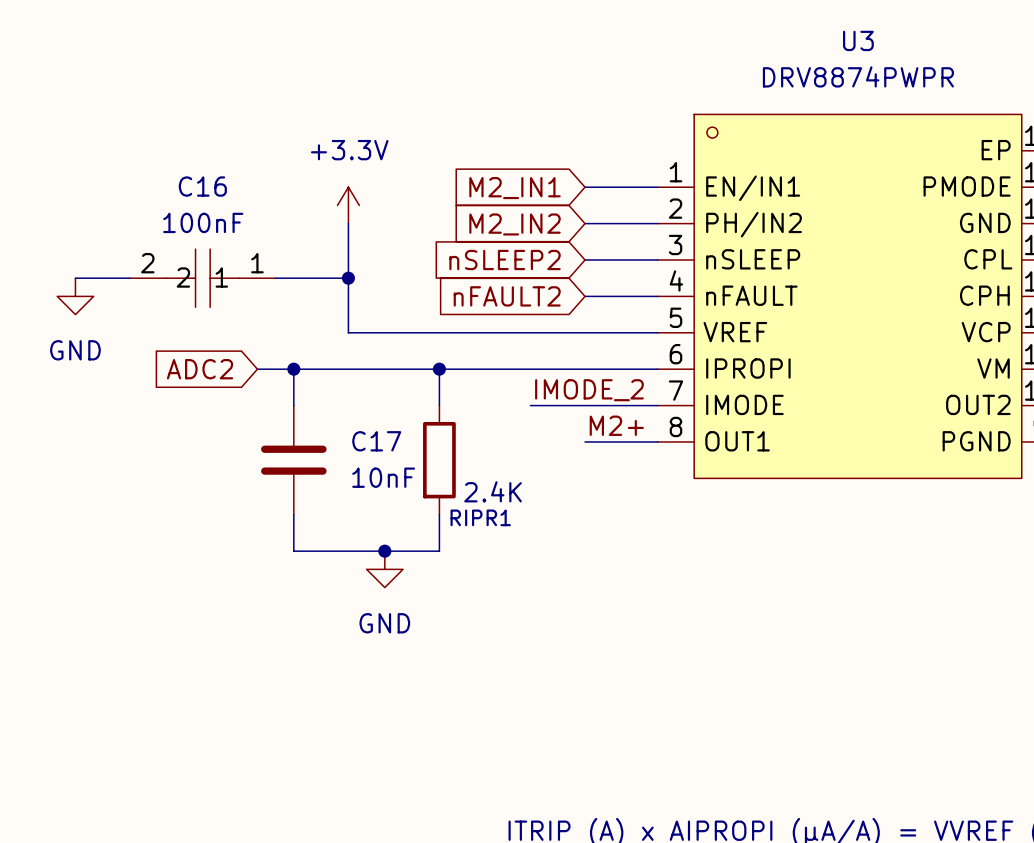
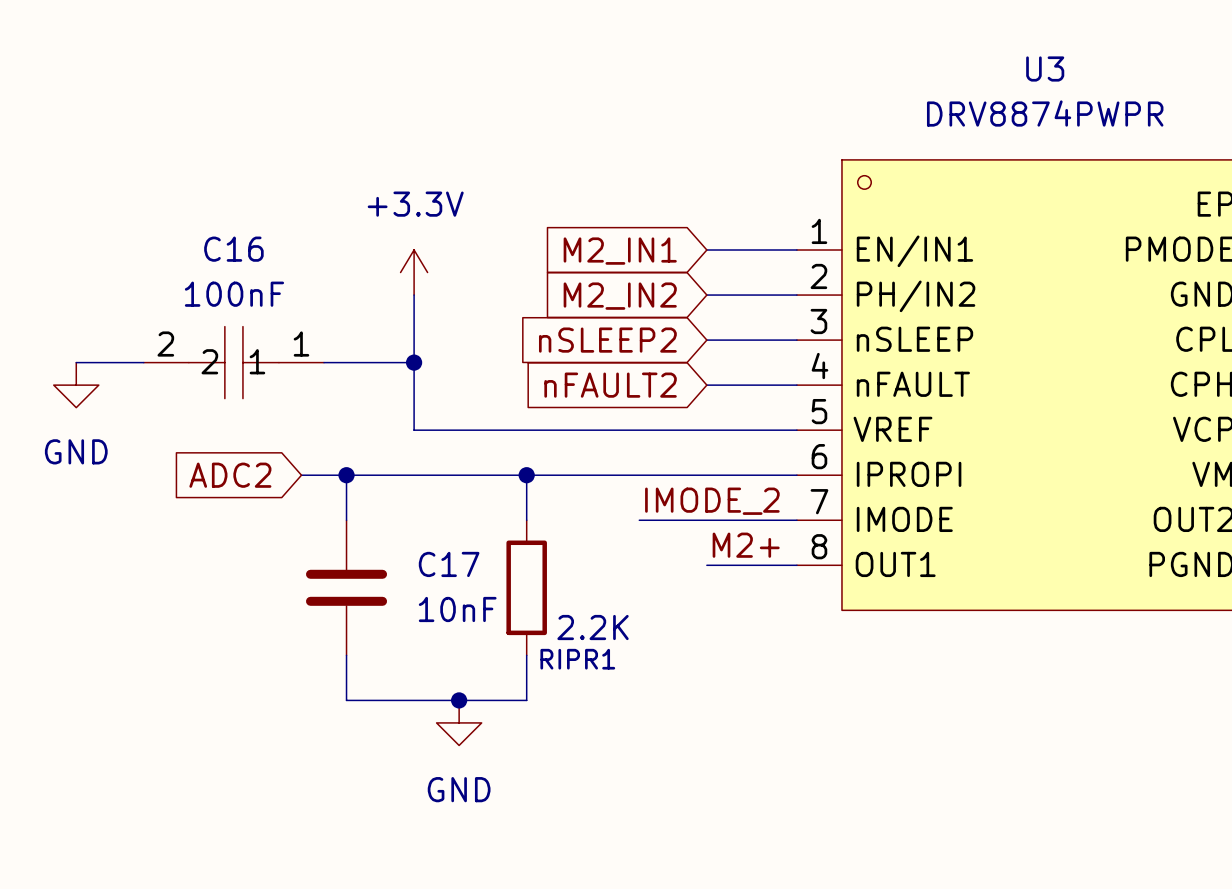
RIPR1 value: 2.4K (493, 491) -> 2.2K (593, 627)

